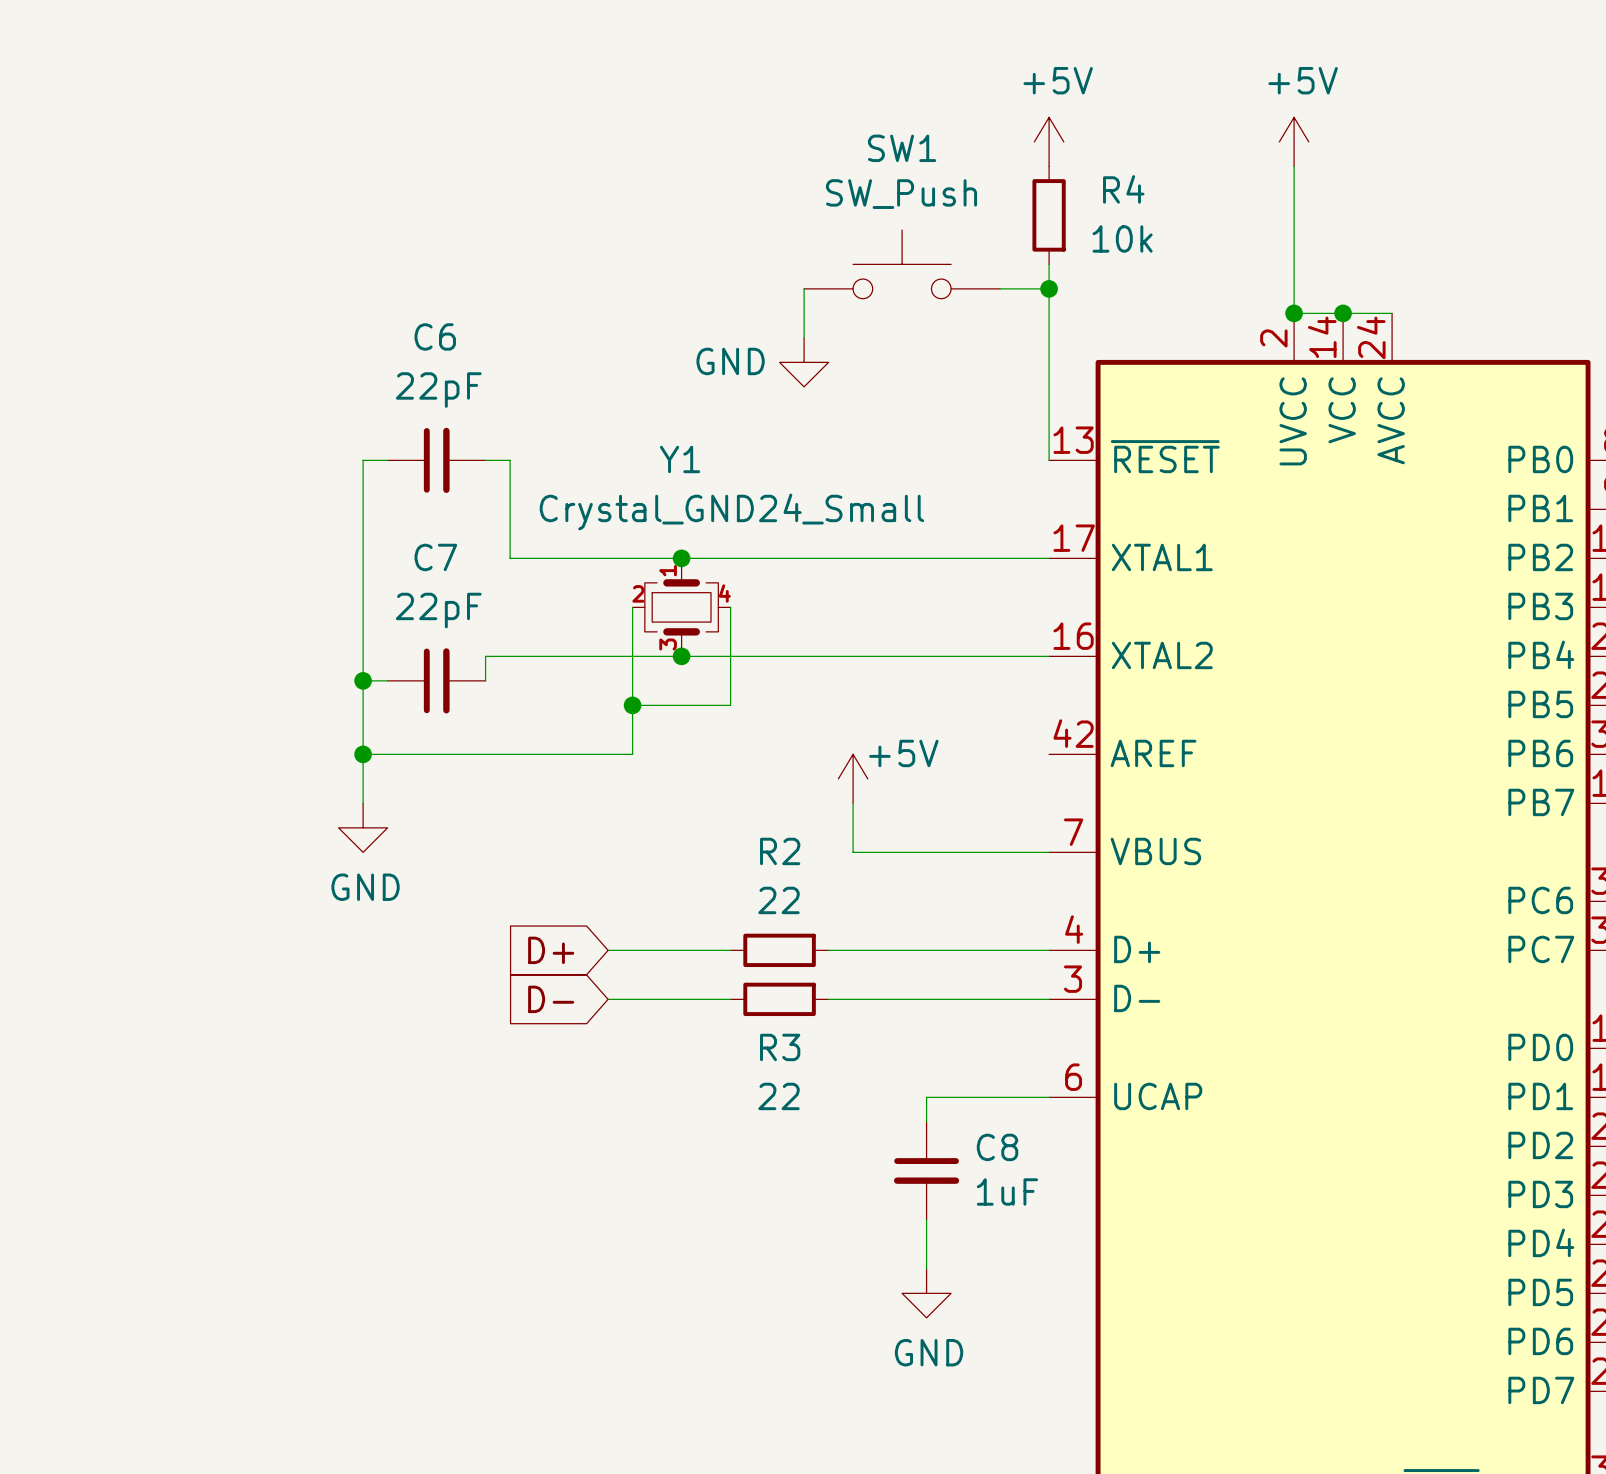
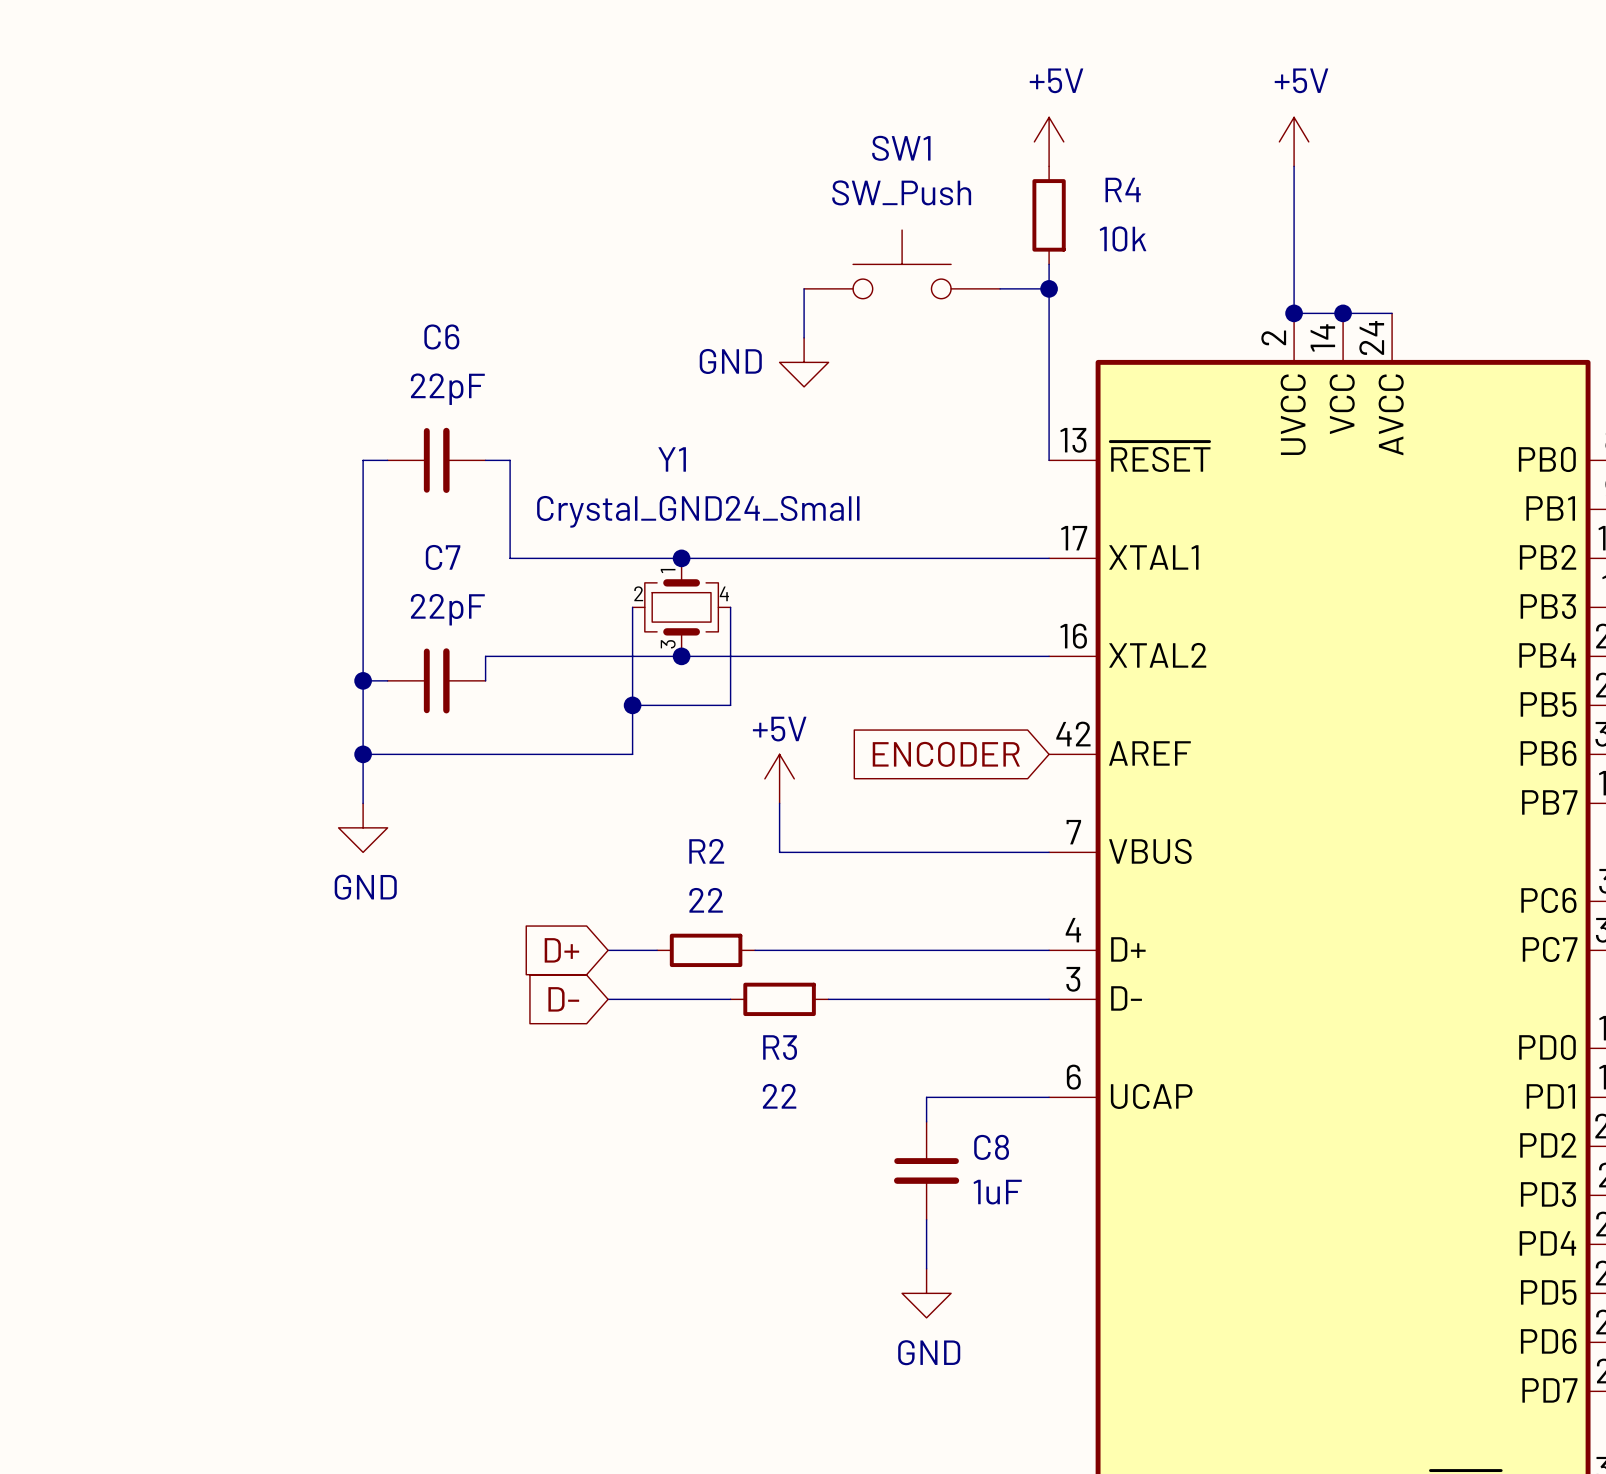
power symbol text position: +5V (903, 753) -> +5V (779, 729)
global label: none -> ENCODER (946, 754)
power symbol position: +5V (853, 778) -> +5V (779, 778)
wire: (853, 803) (853, 852) -> (779, 803) (779, 852) (853, 852)
wire: (657, 950) (730, 950) -> (755, 950) (828, 950)
R2 position: (779, 950) -> (706, 950)

